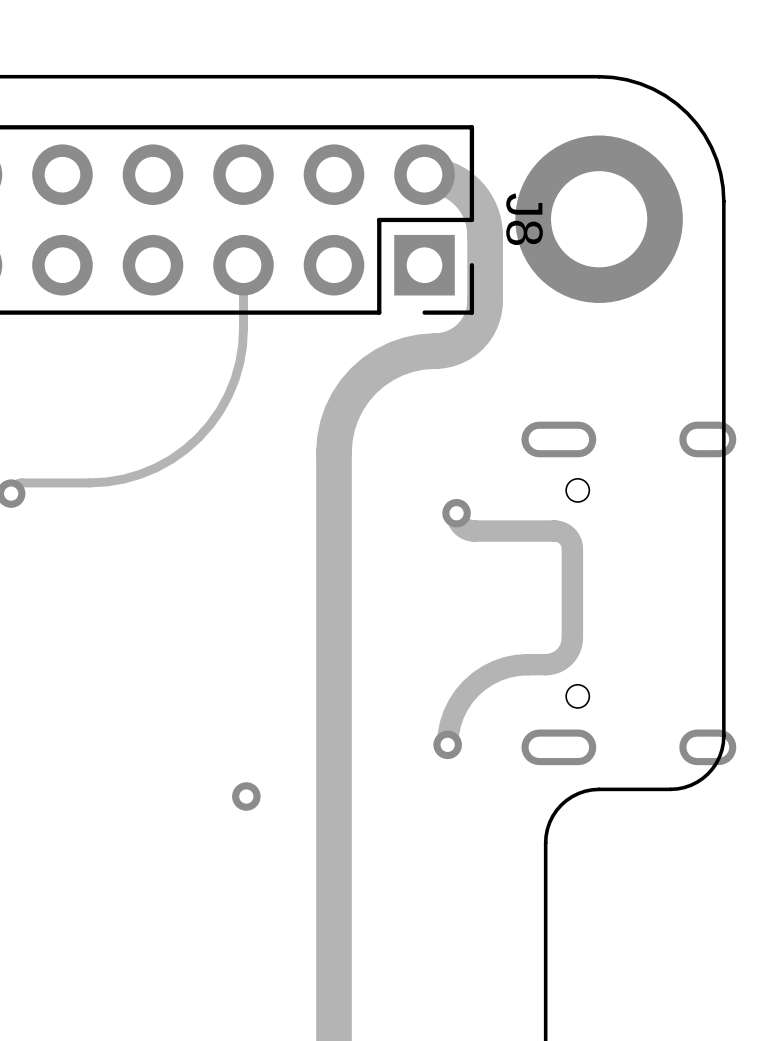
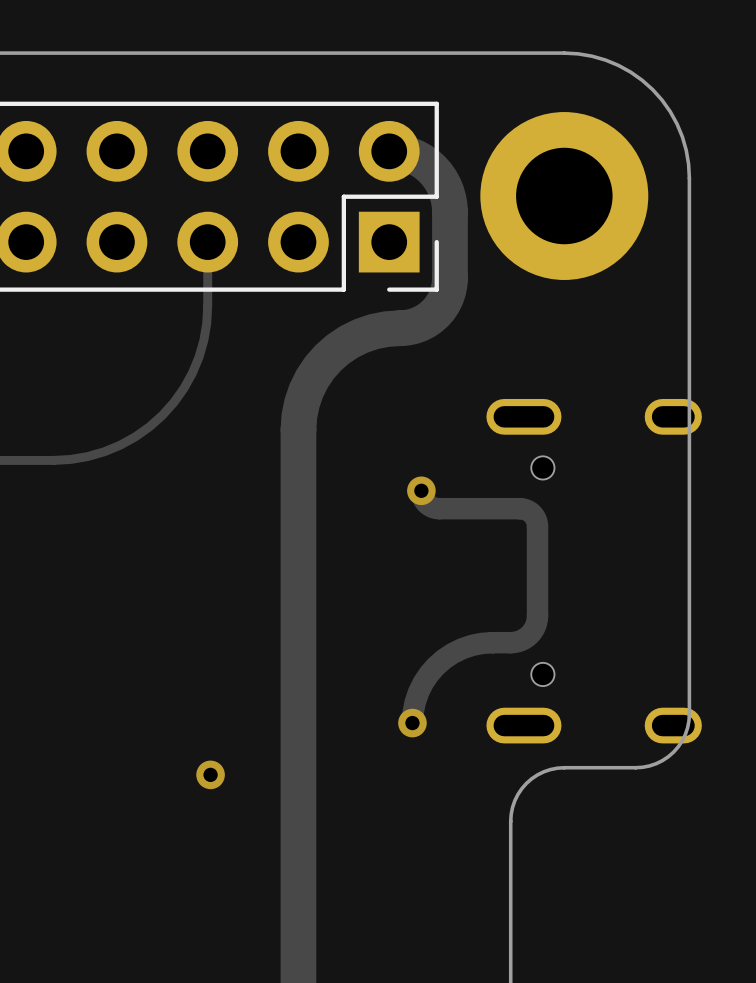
J8 name: J8 (524, 219) -> none

